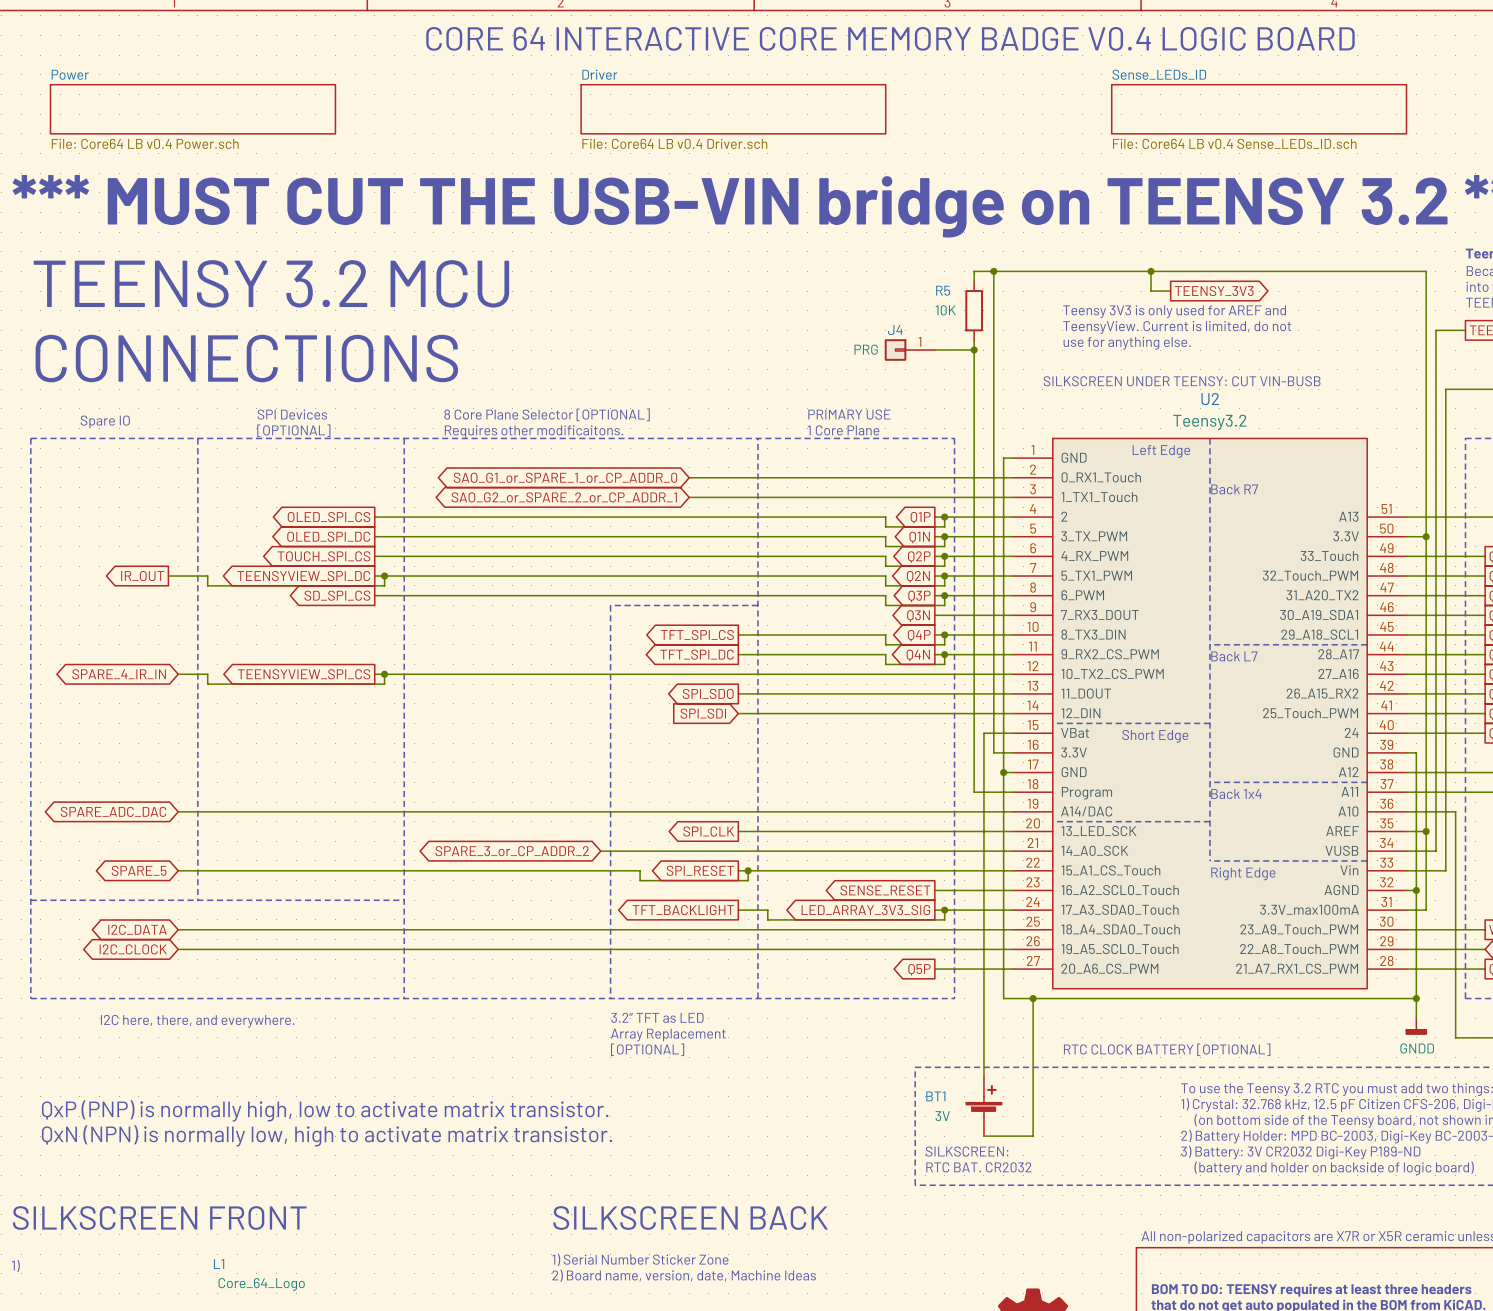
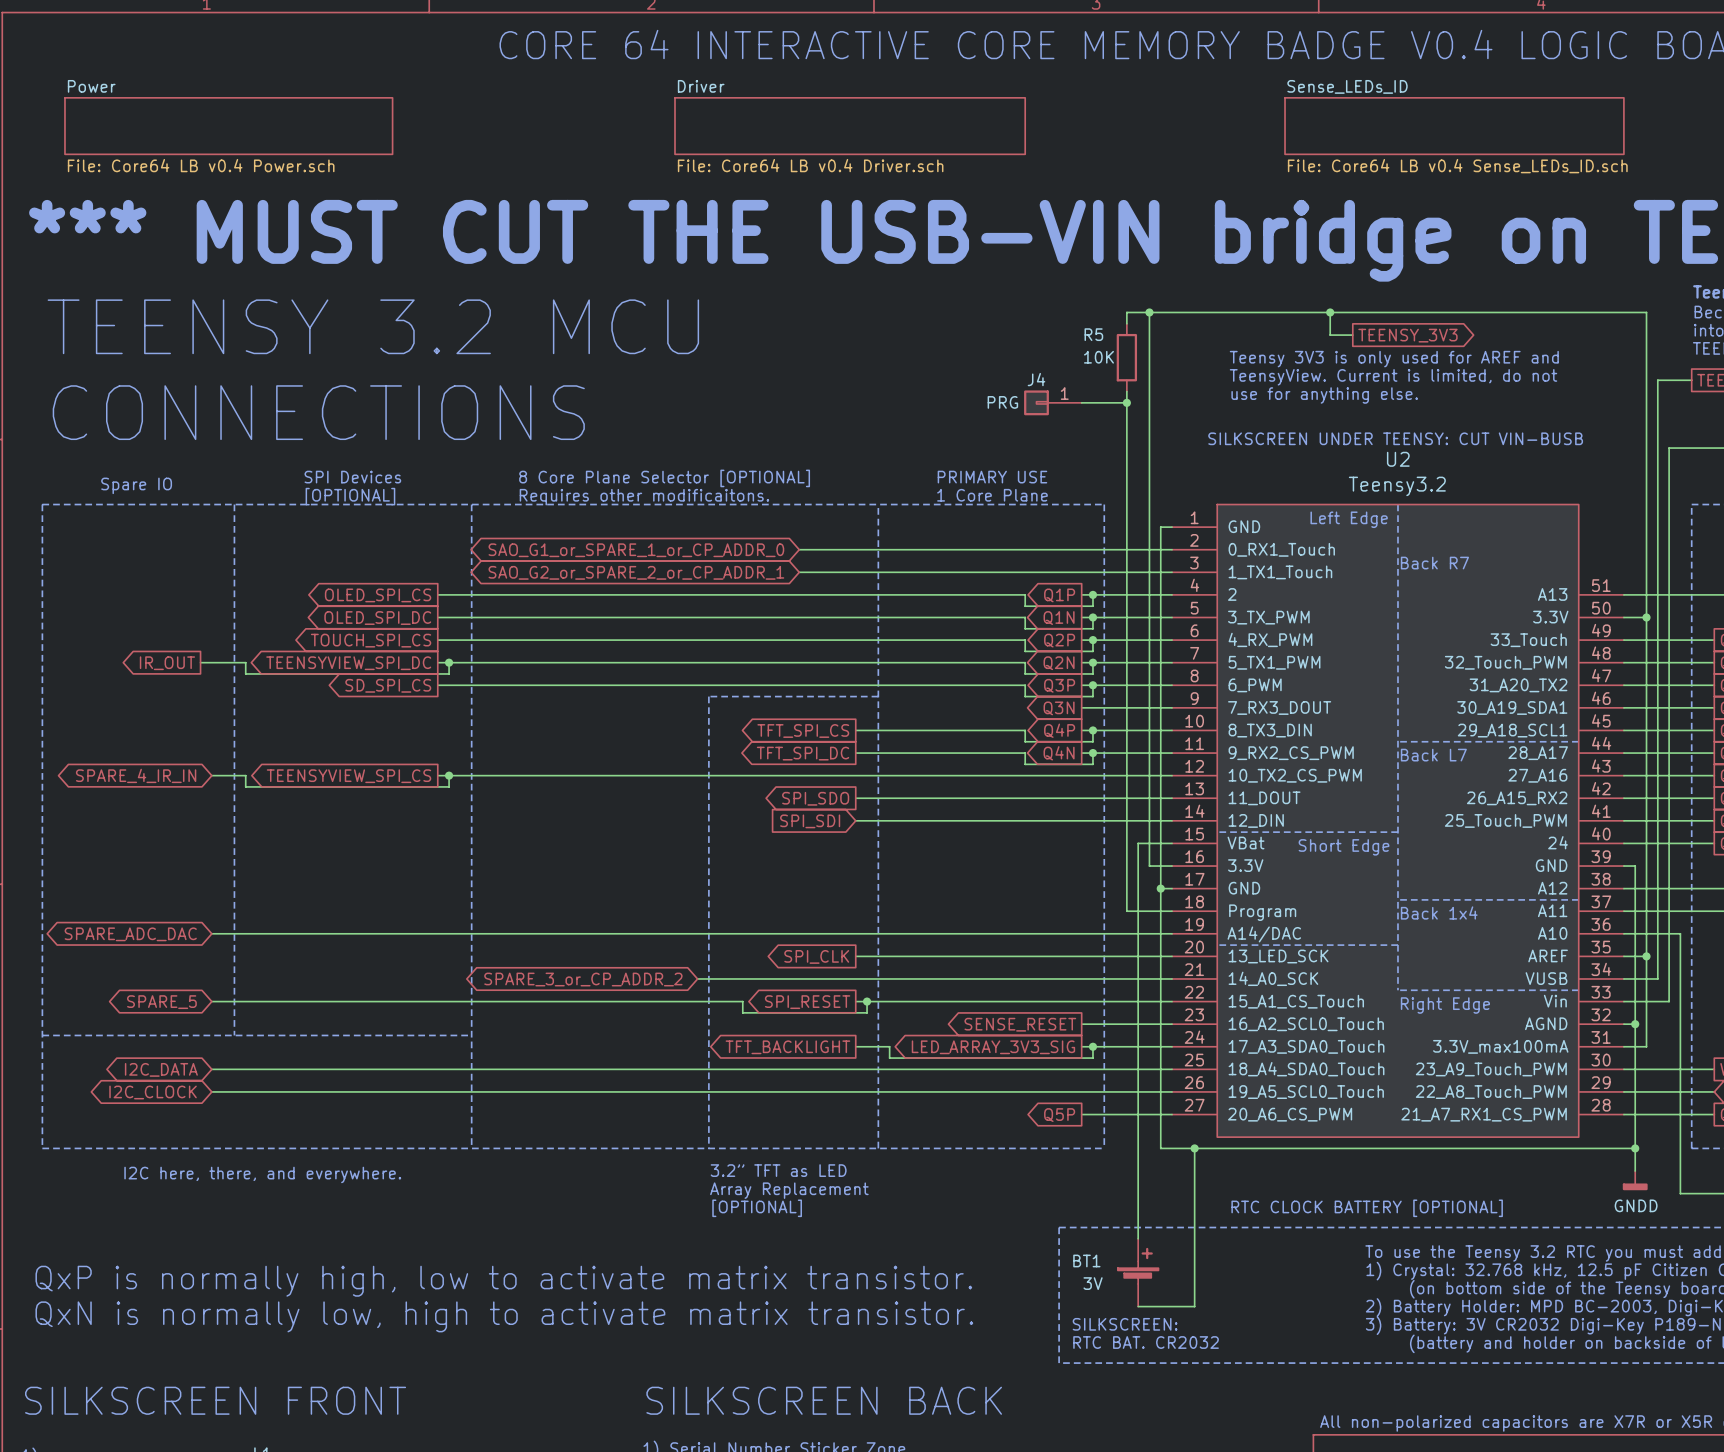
text: QxP (PNP) is normally high, low to activate matrix transistor. (325, 1110) -> none
text: none -> QxP is normally high, low to activate matrix transistor. (503, 1281)
text: QxN (NPN) is normally low, high to activate matrix transistor. (327, 1135) -> none
text: none -> QxN is normally low, high to activate matrix transistor. (504, 1316)

